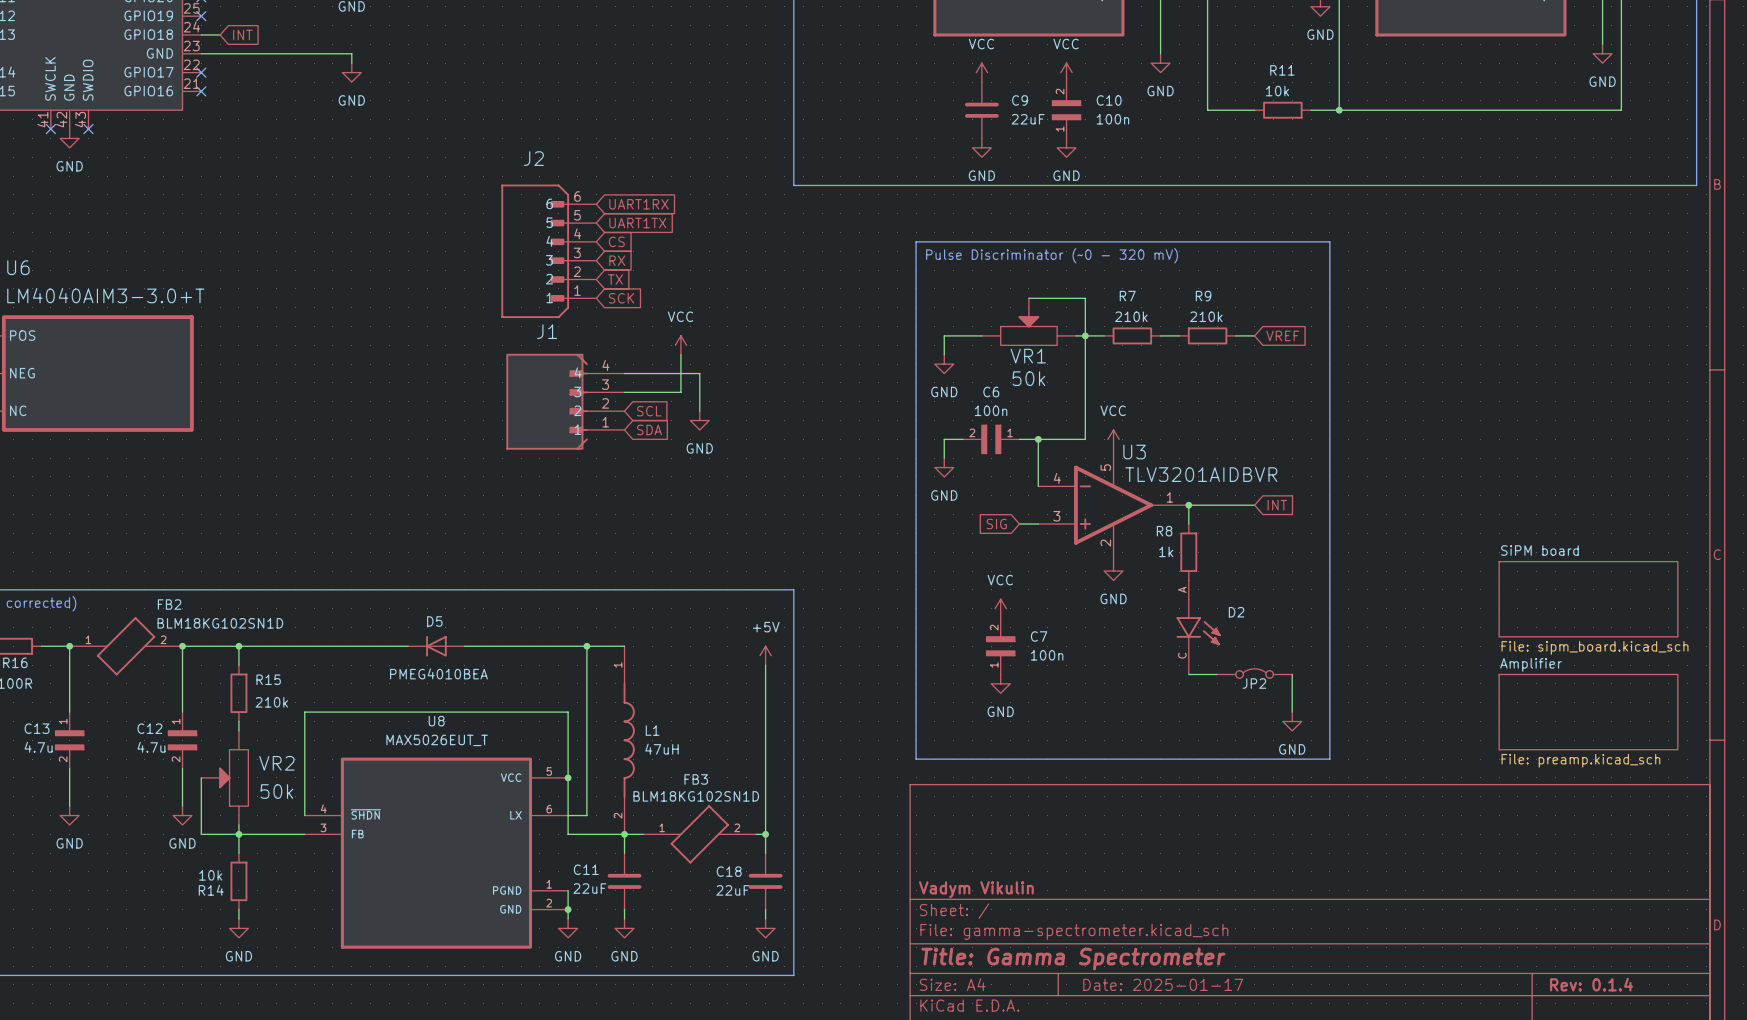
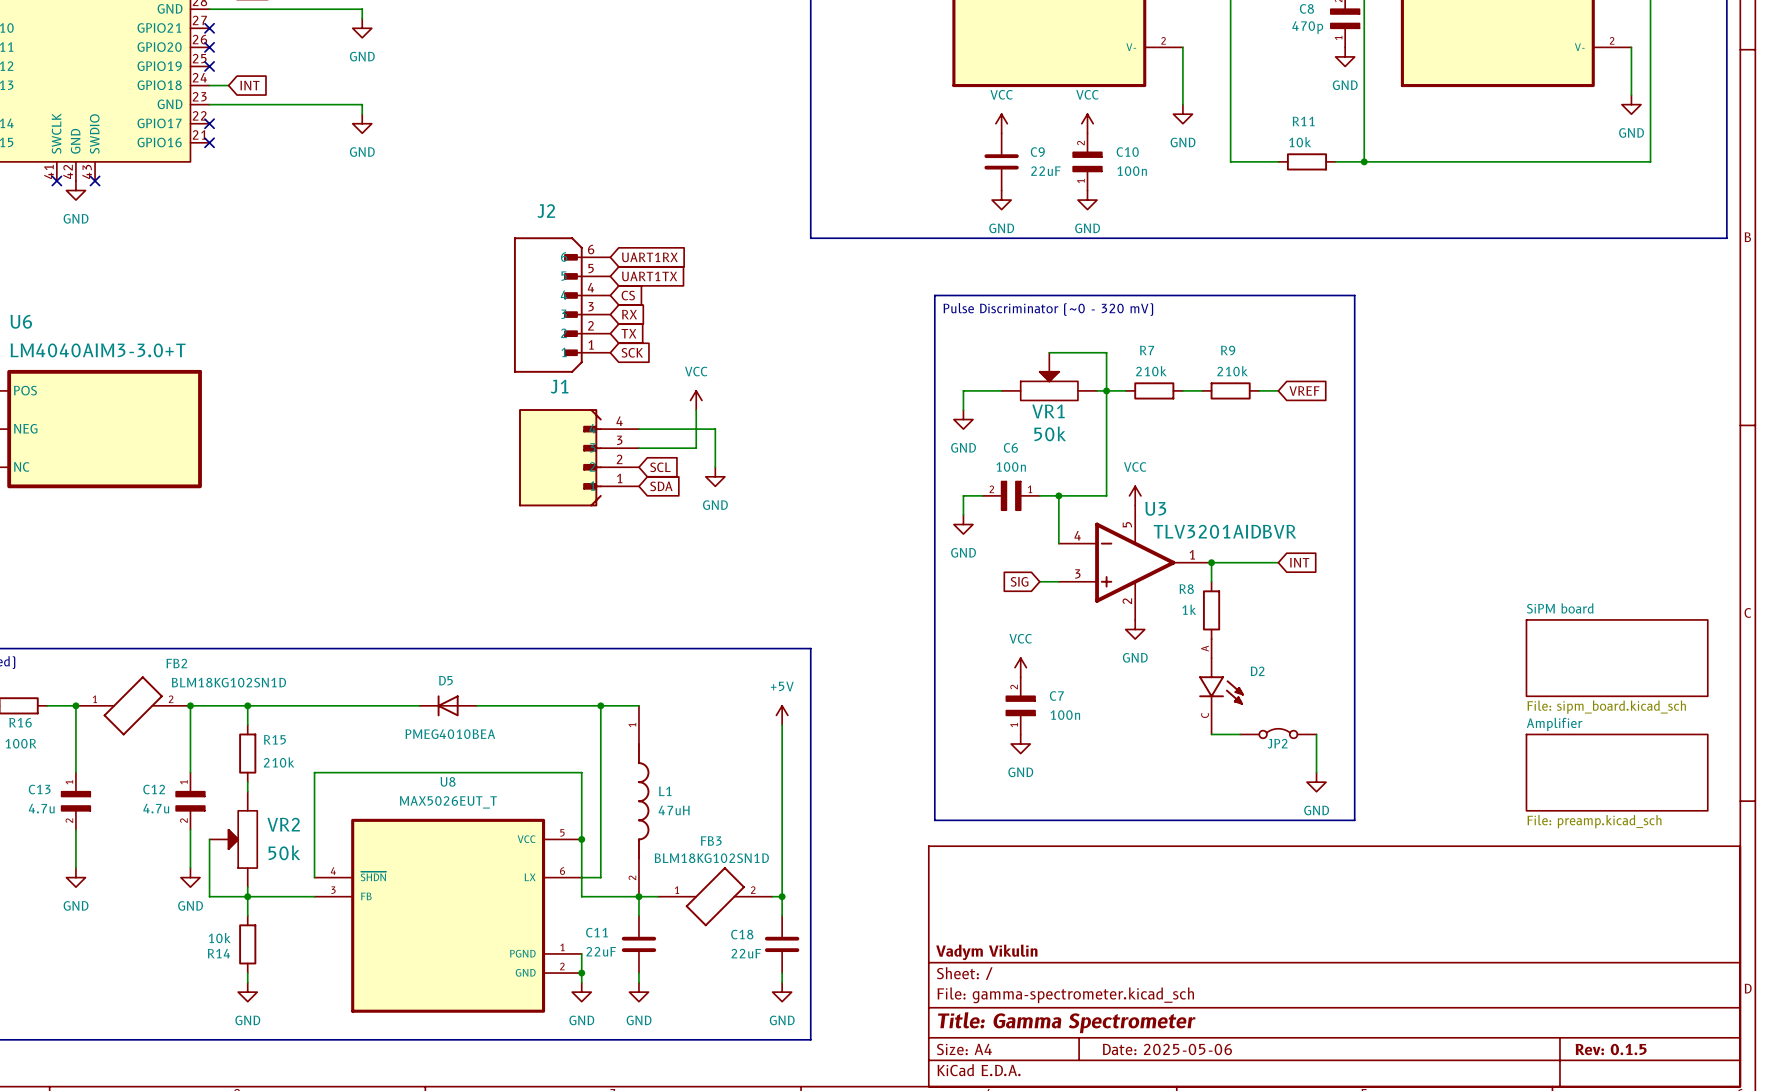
title block: Date: 2025-01-17 (1163, 984) -> Date: 2025-05-06 (1167, 1049)
title block: Rev: 0.1.4 (1591, 984) -> Rev: 0.1.5 (1611, 1049)

